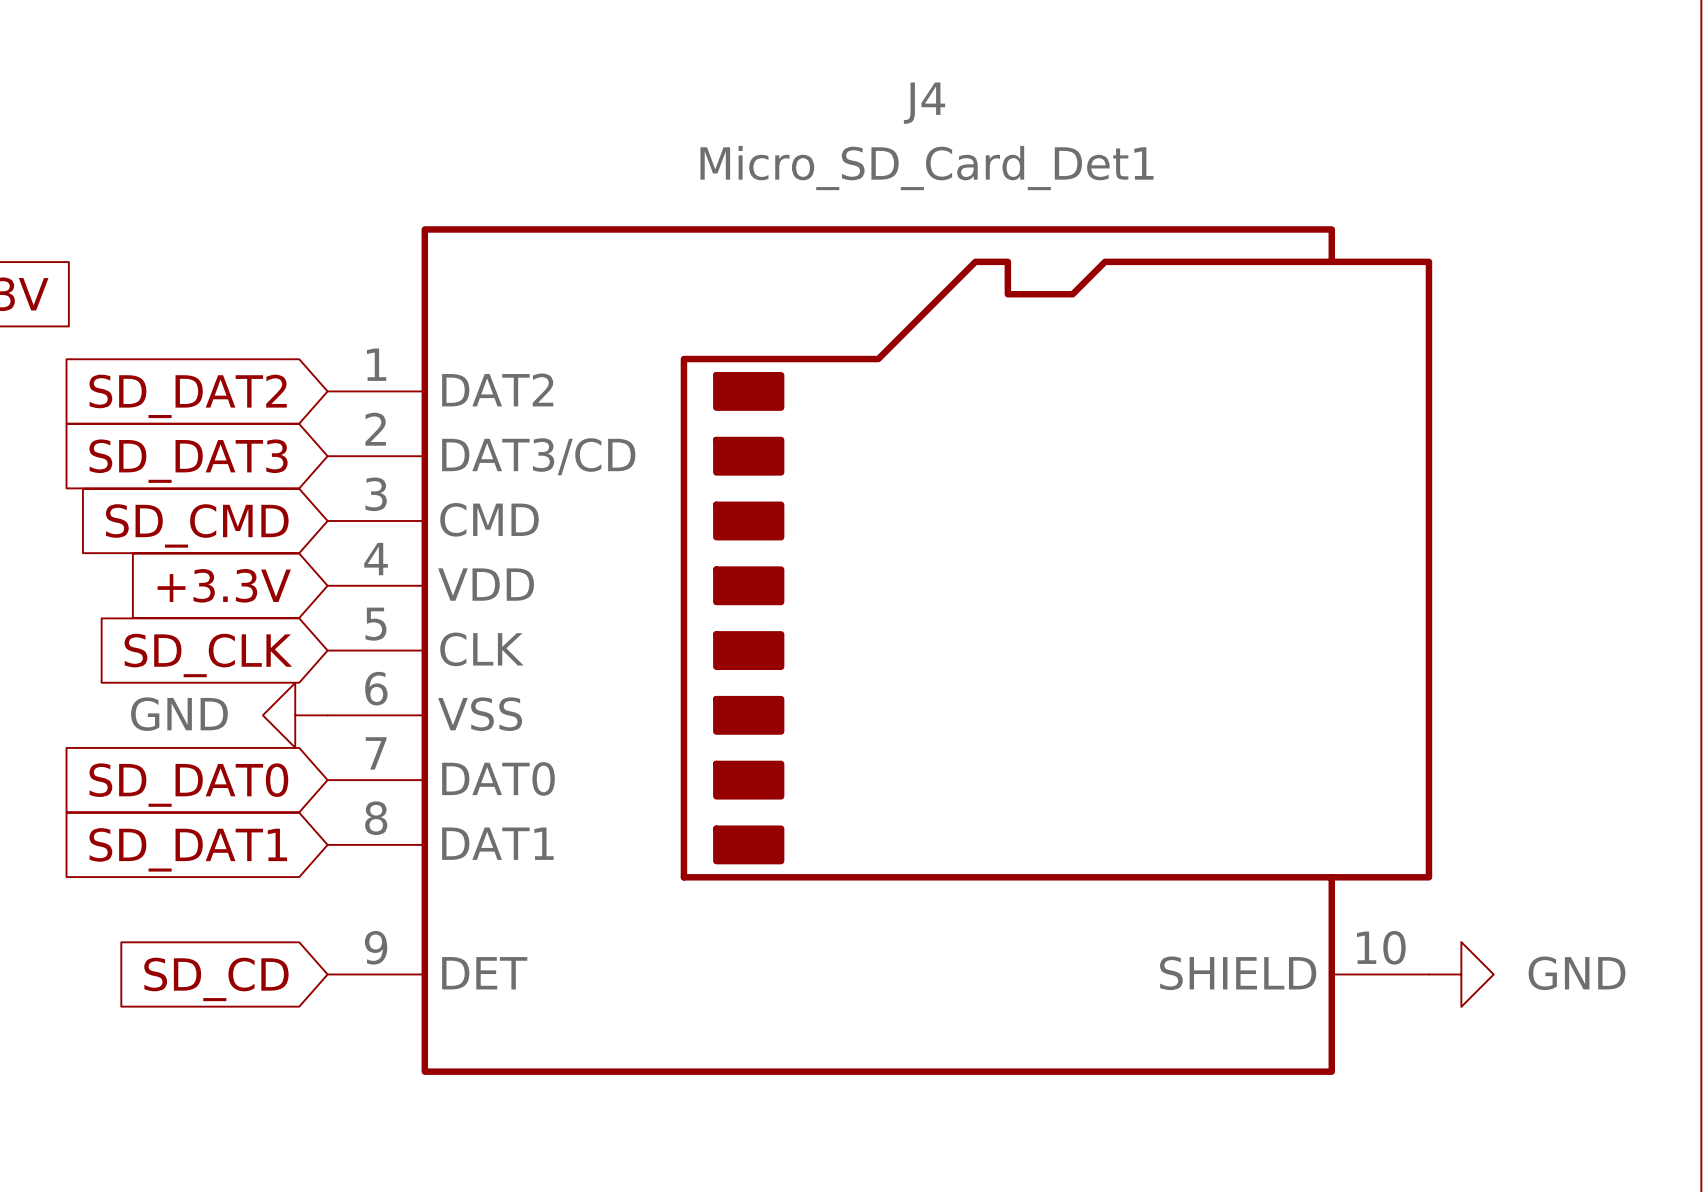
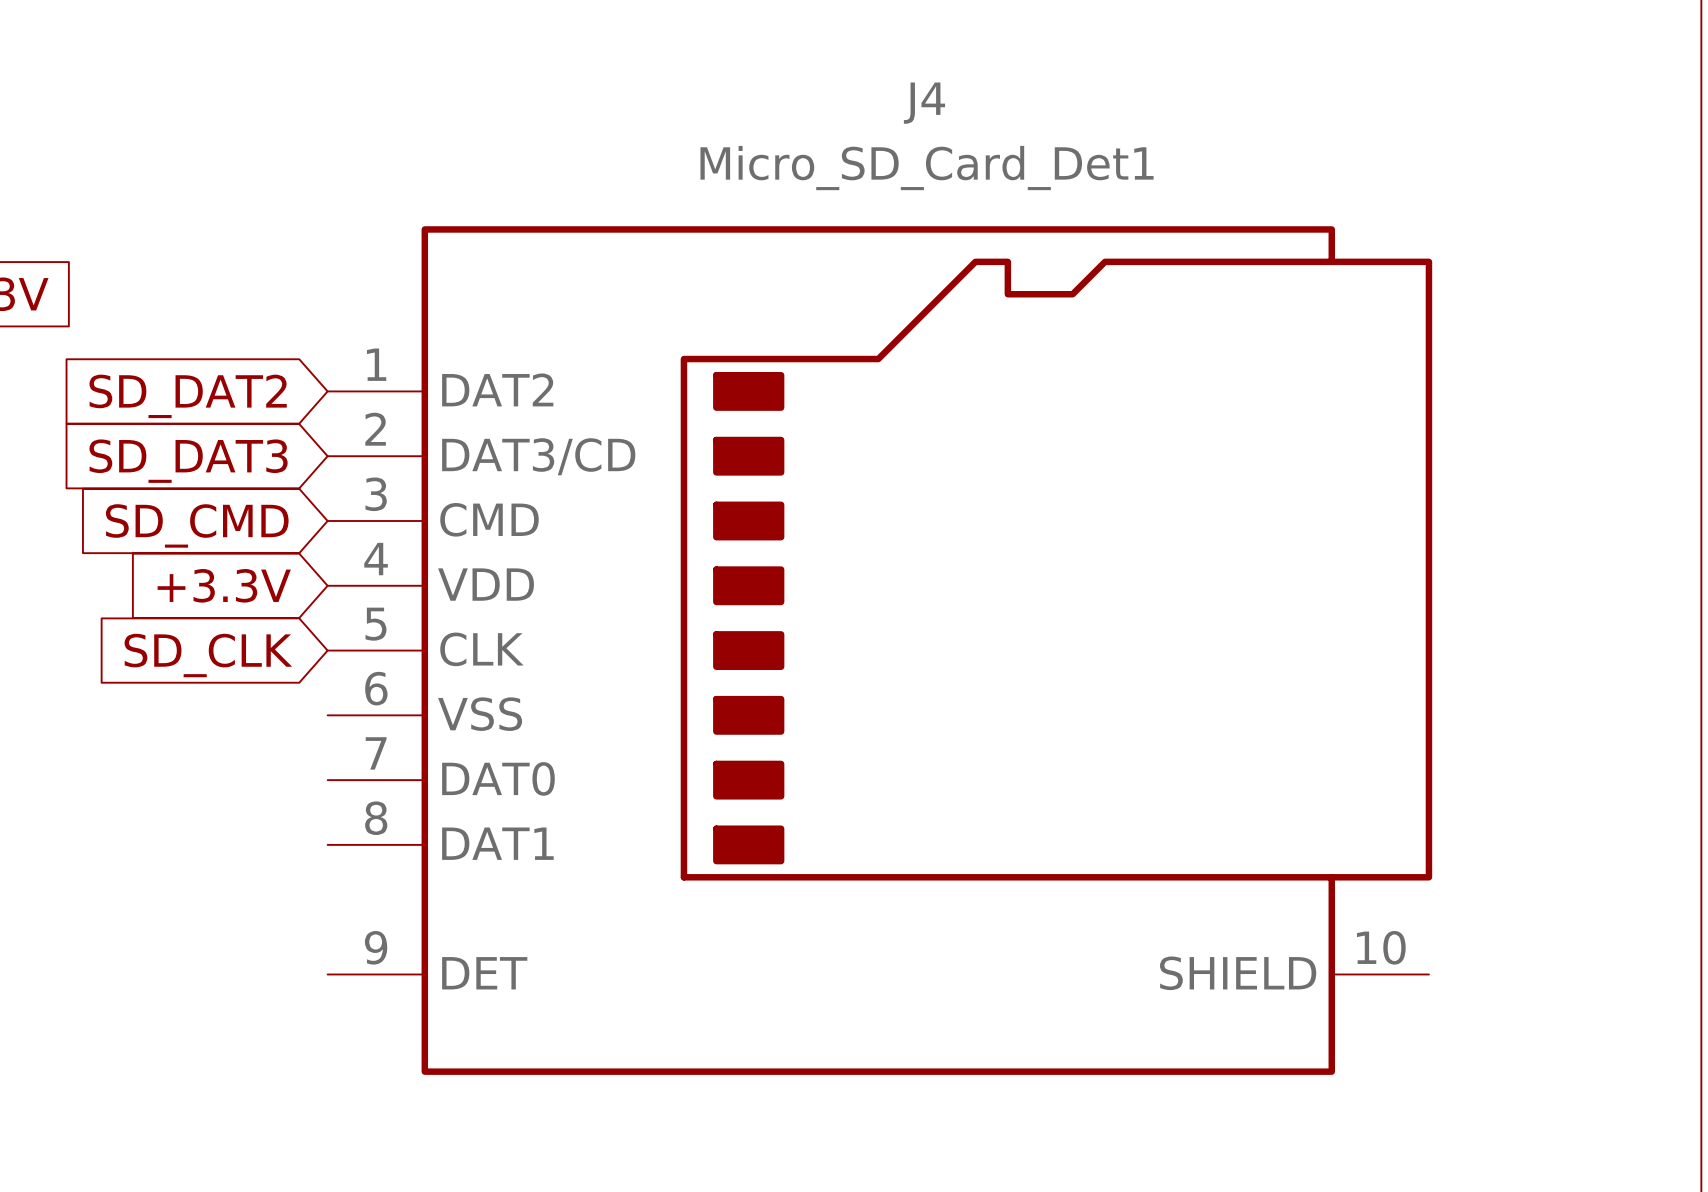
power symbol: GND (295, 715) -> none
global label: SD_DAT0 (188, 785) -> none
global label: SD_DAT1 (188, 849) -> none
power symbol: GND (1461, 974) -> none
global label: SD_CD (216, 979) -> none

